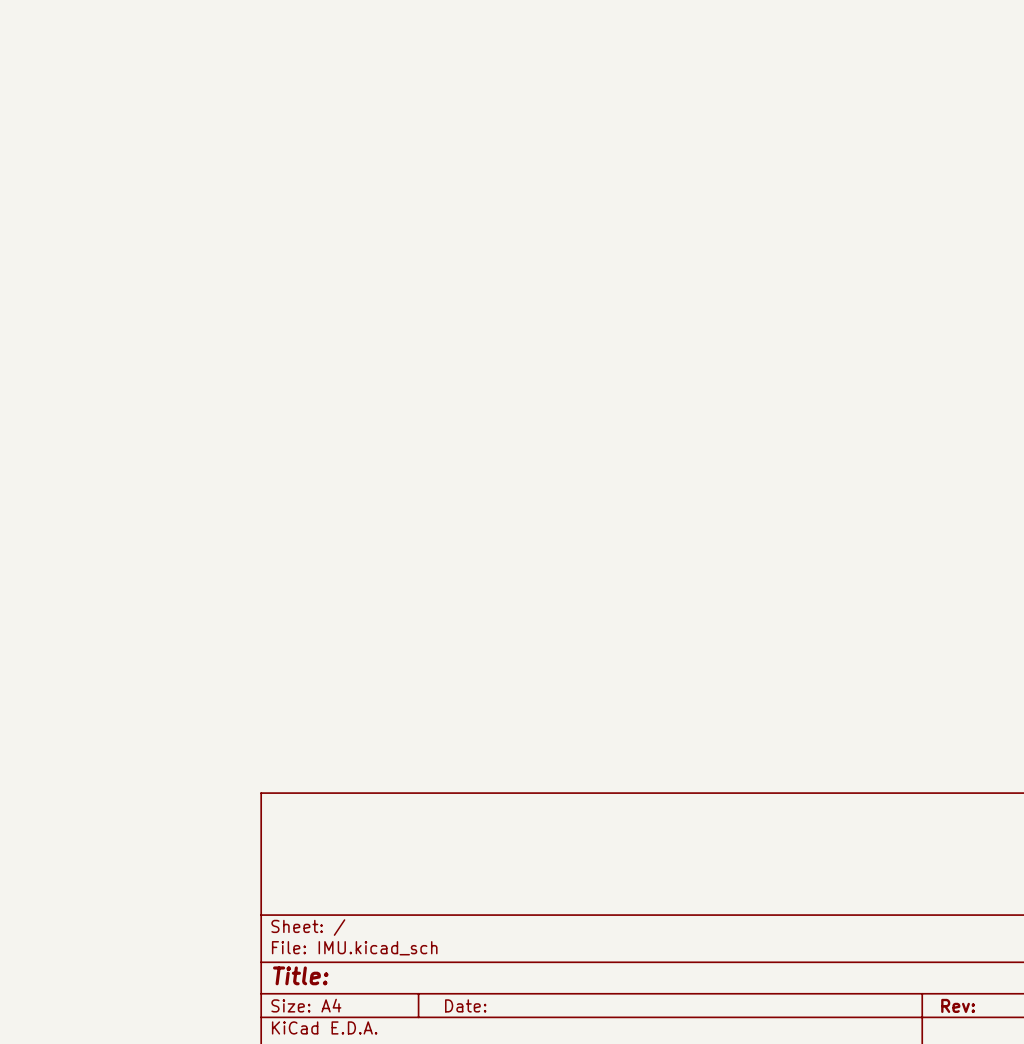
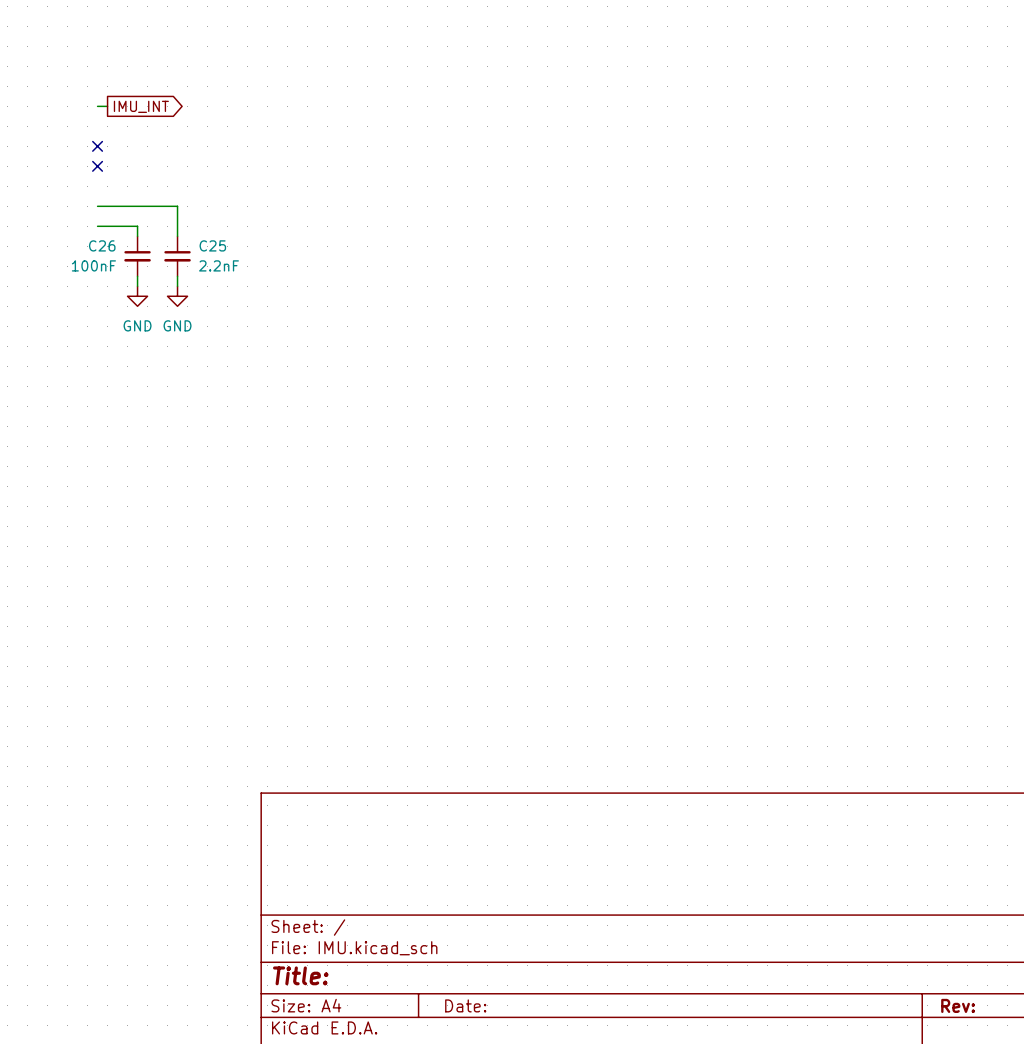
wire: none -> (97, 106) (107, 106)
global label: none -> IMU_INT (141, 106)
no-connect mark: none -> (97, 146)
no-connect mark: none -> (97, 166)
wire: none -> (97, 206) (177, 206) (177, 236)
wire: none -> (97, 226) (137, 226) (137, 236)
C26: none -> 100nF (137, 256)
C25: none -> 2.2nF (177, 256)
wire: none -> (137, 276) (137, 286)
wire: none -> (177, 276) (177, 286)
power symbol: none -> GND (137, 296)
power symbol: none -> GND (177, 296)

